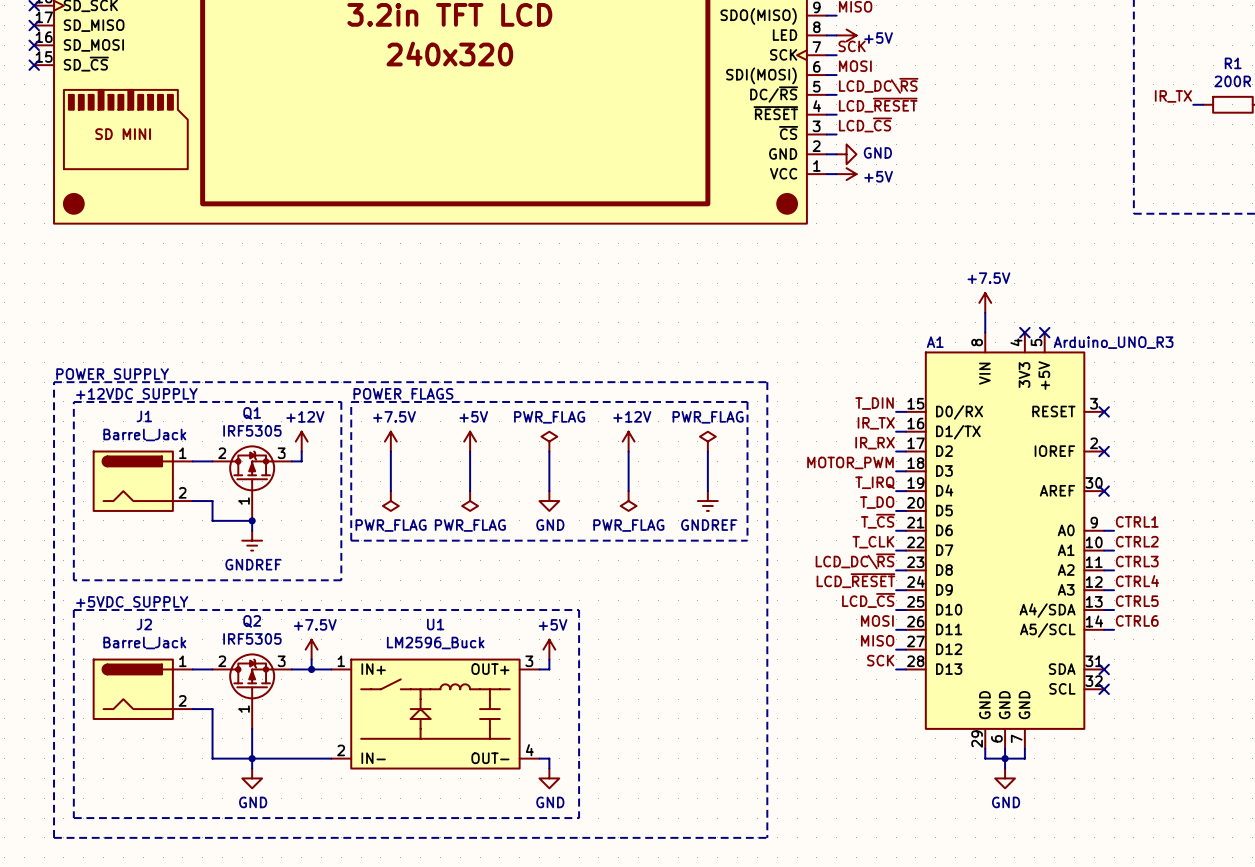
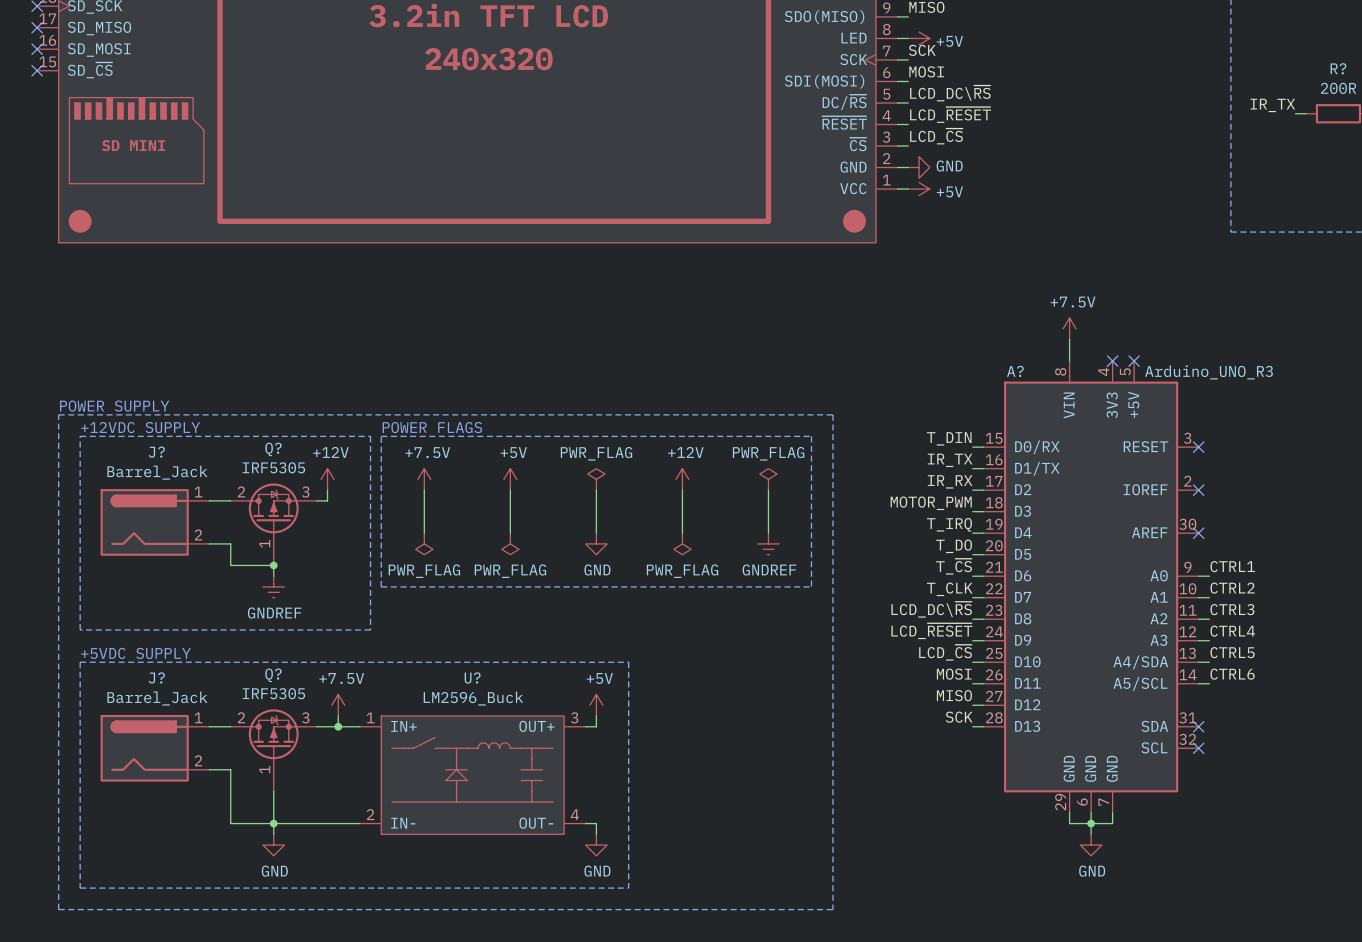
R1 name: R1 (1233, 63) -> R? (1338, 68)
A1 name: A1 (935, 342) -> A? (1015, 371)
Q1 name: Q1 (252, 413) -> Q? (273, 449)
J1 name: J1 (144, 416) -> J? (156, 452)
Q2 name: Q2 (252, 621) -> Q? (273, 675)
J2 name: J2 (144, 624) -> J? (156, 677)
U1 name: U1 (435, 624) -> U? (472, 677)

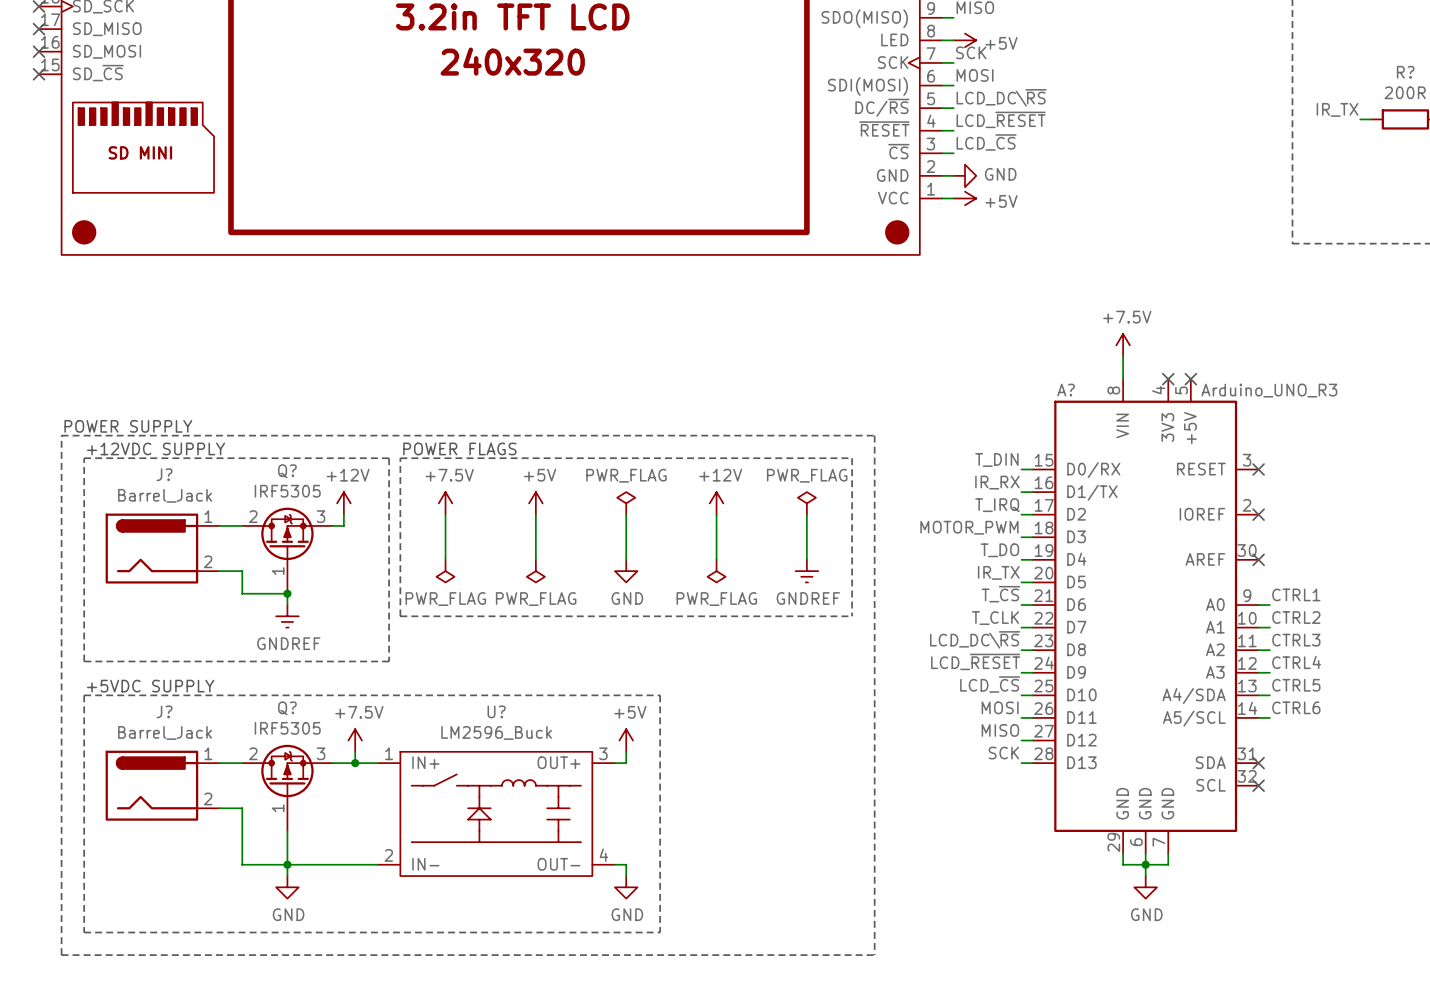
label: IR_TX (950, 460) -> IR_RX (997, 482)
label: IR_RX (950, 481) -> T_IRQ (997, 505)
label: T_IRQ (949, 524) -> T_DO (999, 550)
label: T_DO (954, 546) -> IR_TX (998, 572)

